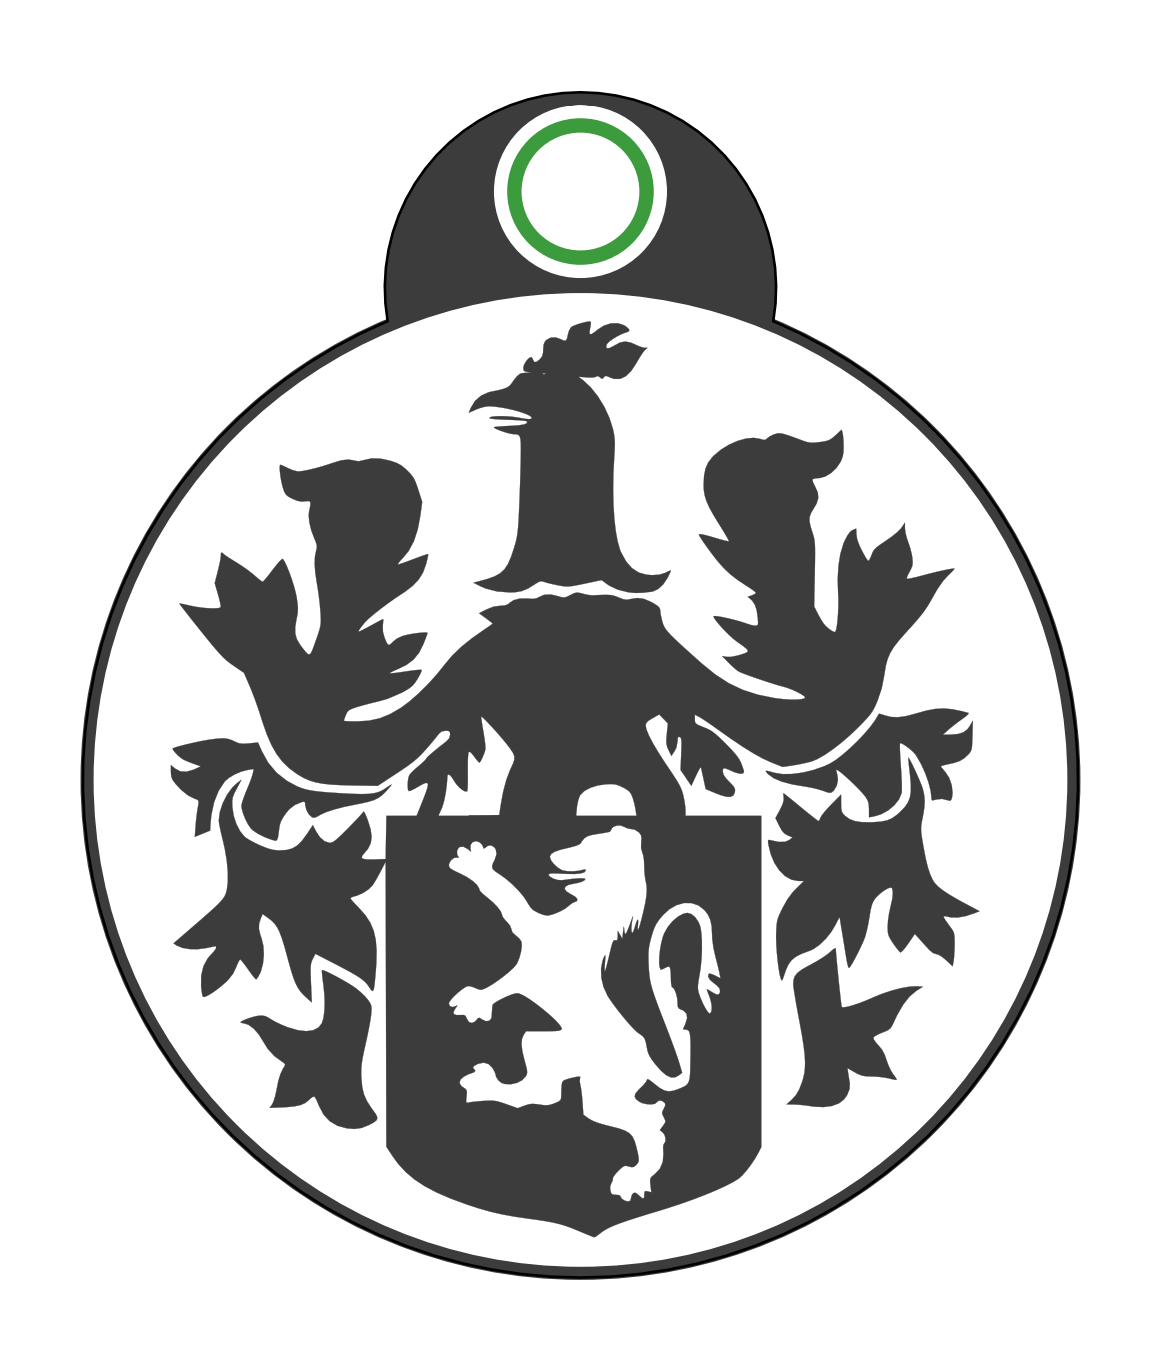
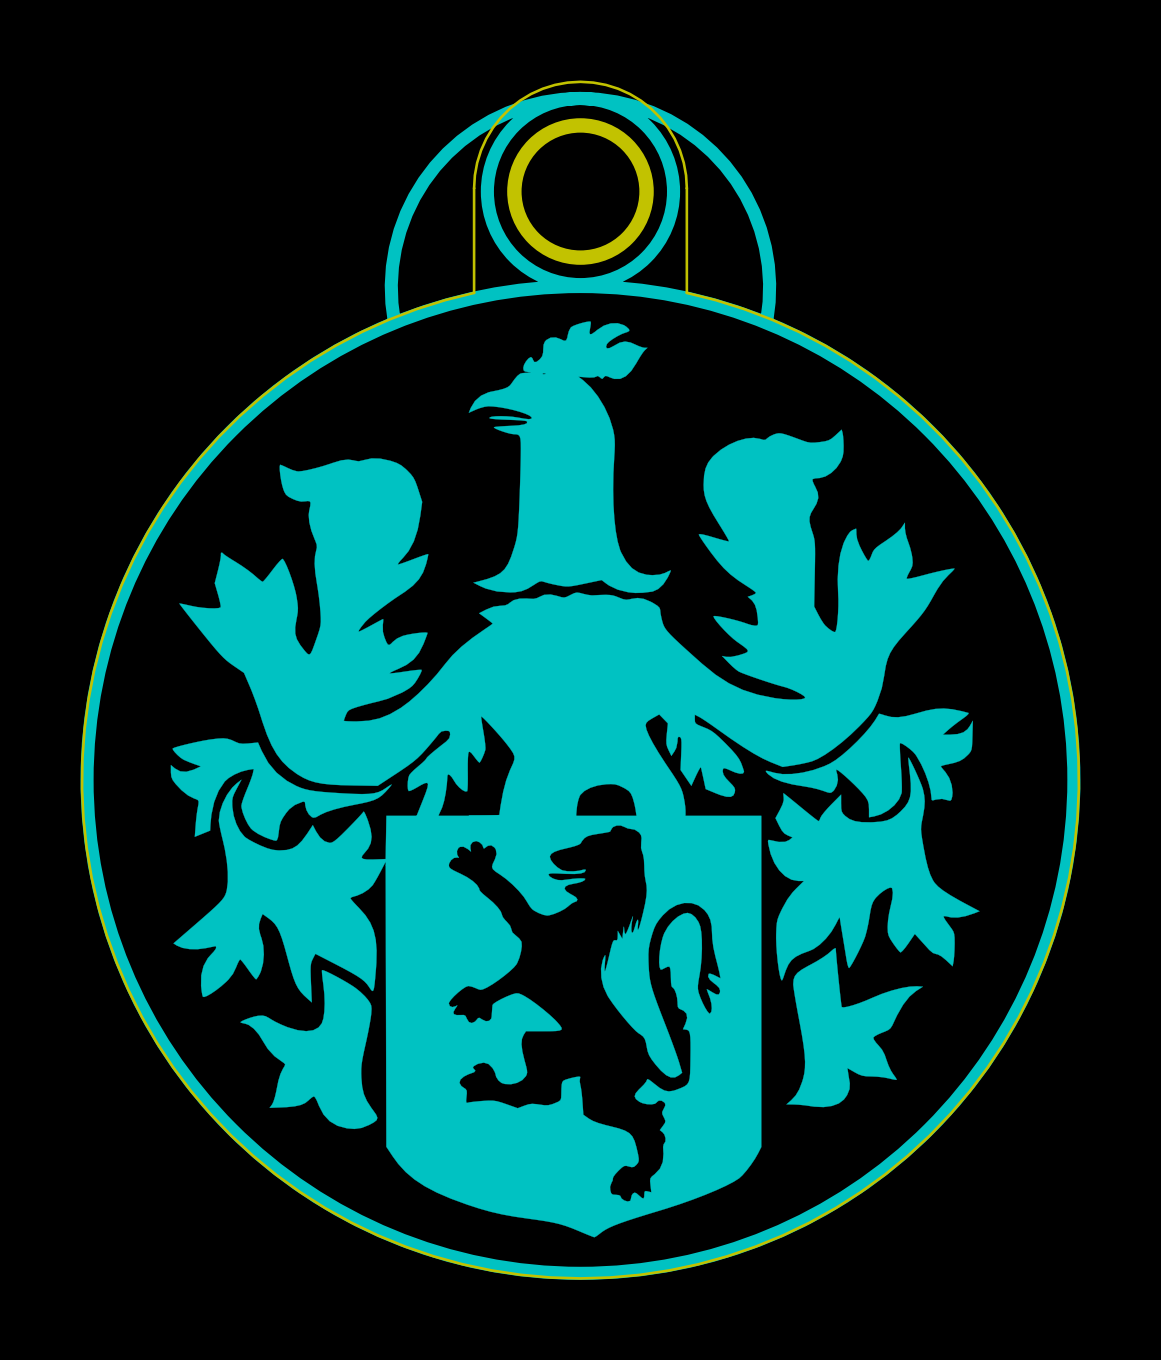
drawing: [605, 99, 769, 324] -> none
drawing: [392, 106, 556, 324] -> none
board edge: (773, 321) (775, 303) (775, 267) (772, 249) (762, 215) (754, 199) (735, 168) (724, 155) (697, 131) (667, 112) (650, 105) (633, 99) (598, 93) (562, 93) (544, 95) (510, 105) (478, 121) (449, 142) (425, 168) (406, 199) (392, 232) (385, 267) (385, 303) (387, 321) (360, 333) (309, 362) (261, 398) (239, 417) (198, 461) (163, 508) (147, 534) (121, 587) (110, 615) (94, 672) (85, 730) (83, 760) (84, 819) (92, 878) (99, 907) (117, 963) (143, 1017) (158, 1042) (192, 1091) (211, 1113) (232, 1135) (276, 1174) (326, 1207) (378, 1234) (406, 1246) (462, 1263) (521, 1274) (550, 1276) (610, 1276) (639, 1274) (698, 1263) (754, 1246) (809, 1221) (834, 1207) (884, 1174) (907, 1155) (928, 1135) (968, 1091) (1002, 1042) (1031, 990) (1042, 963) (1061, 907) (1068, 878) (1076, 819) (1077, 789) (1075, 730) (1066, 672) (1049, 614) (1039, 587) (1013, 534) (980, 484) (942, 438) (899, 398) (851, 362) (800, 333) (773, 321) -> (686, 188) (686, 292) (744, 309) (799, 331) (825, 345) (875, 378) (921, 416) (962, 459) (997, 507) (1013, 532) (1027, 558) (1050, 613) (1059, 641) (1072, 699) (1078, 759) (1078, 788) (1074, 848) (1069, 877) (1054, 935) (1032, 990) (1018, 1017) (987, 1067) (950, 1114) (929, 1135) (907, 1155) (860, 1192) (809, 1222) (755, 1246) (698, 1264) (669, 1270) (610, 1277) (580, 1278) (521, 1274) (491, 1270) (433, 1256) (405, 1246) (351, 1222) (300, 1192) (253, 1155) (231, 1135) (210, 1114) (173, 1067) (141, 1017) (116, 963) (98, 906) (91, 877) (86, 848) (82, 788) (82, 759) (88, 699) (101, 641) (121, 585) (133, 558) (147, 532) (180, 482) (218, 437) (262, 396) (285, 378) (335, 345) (361, 331) (416, 309) (474, 292) (474, 188) (477, 162) (486, 138) (500, 117) (509, 108) (531, 94) (555, 84) (567, 82) (593, 82) (605, 84) (629, 94) (651, 108) (660, 117) (674, 138) (683, 162) (686, 188)

